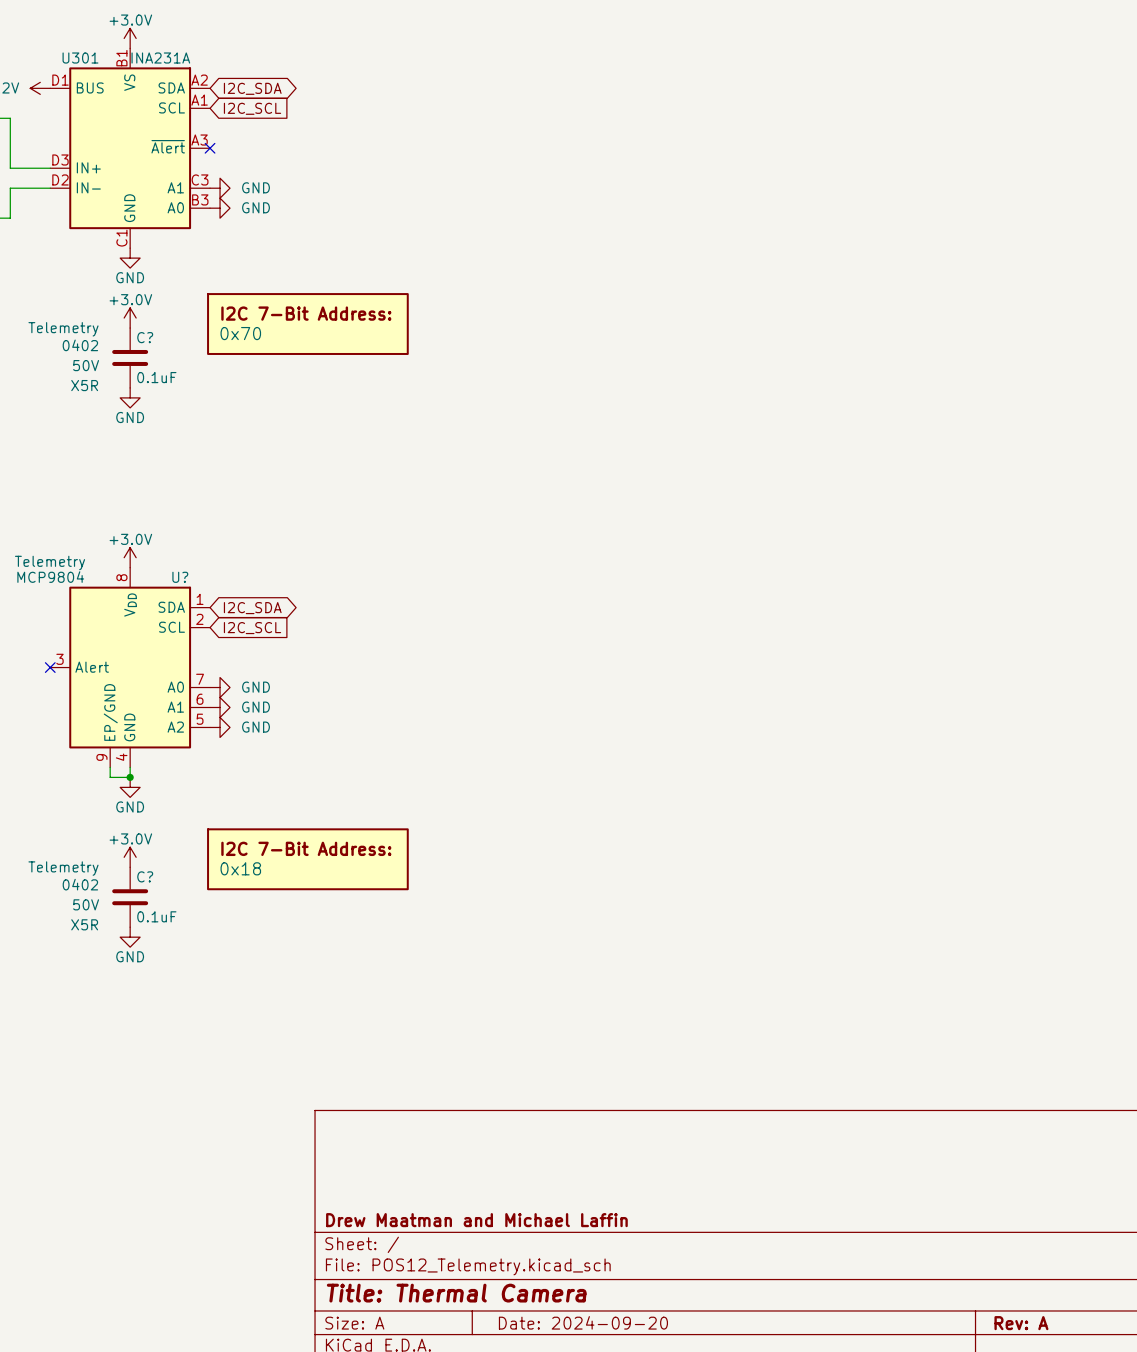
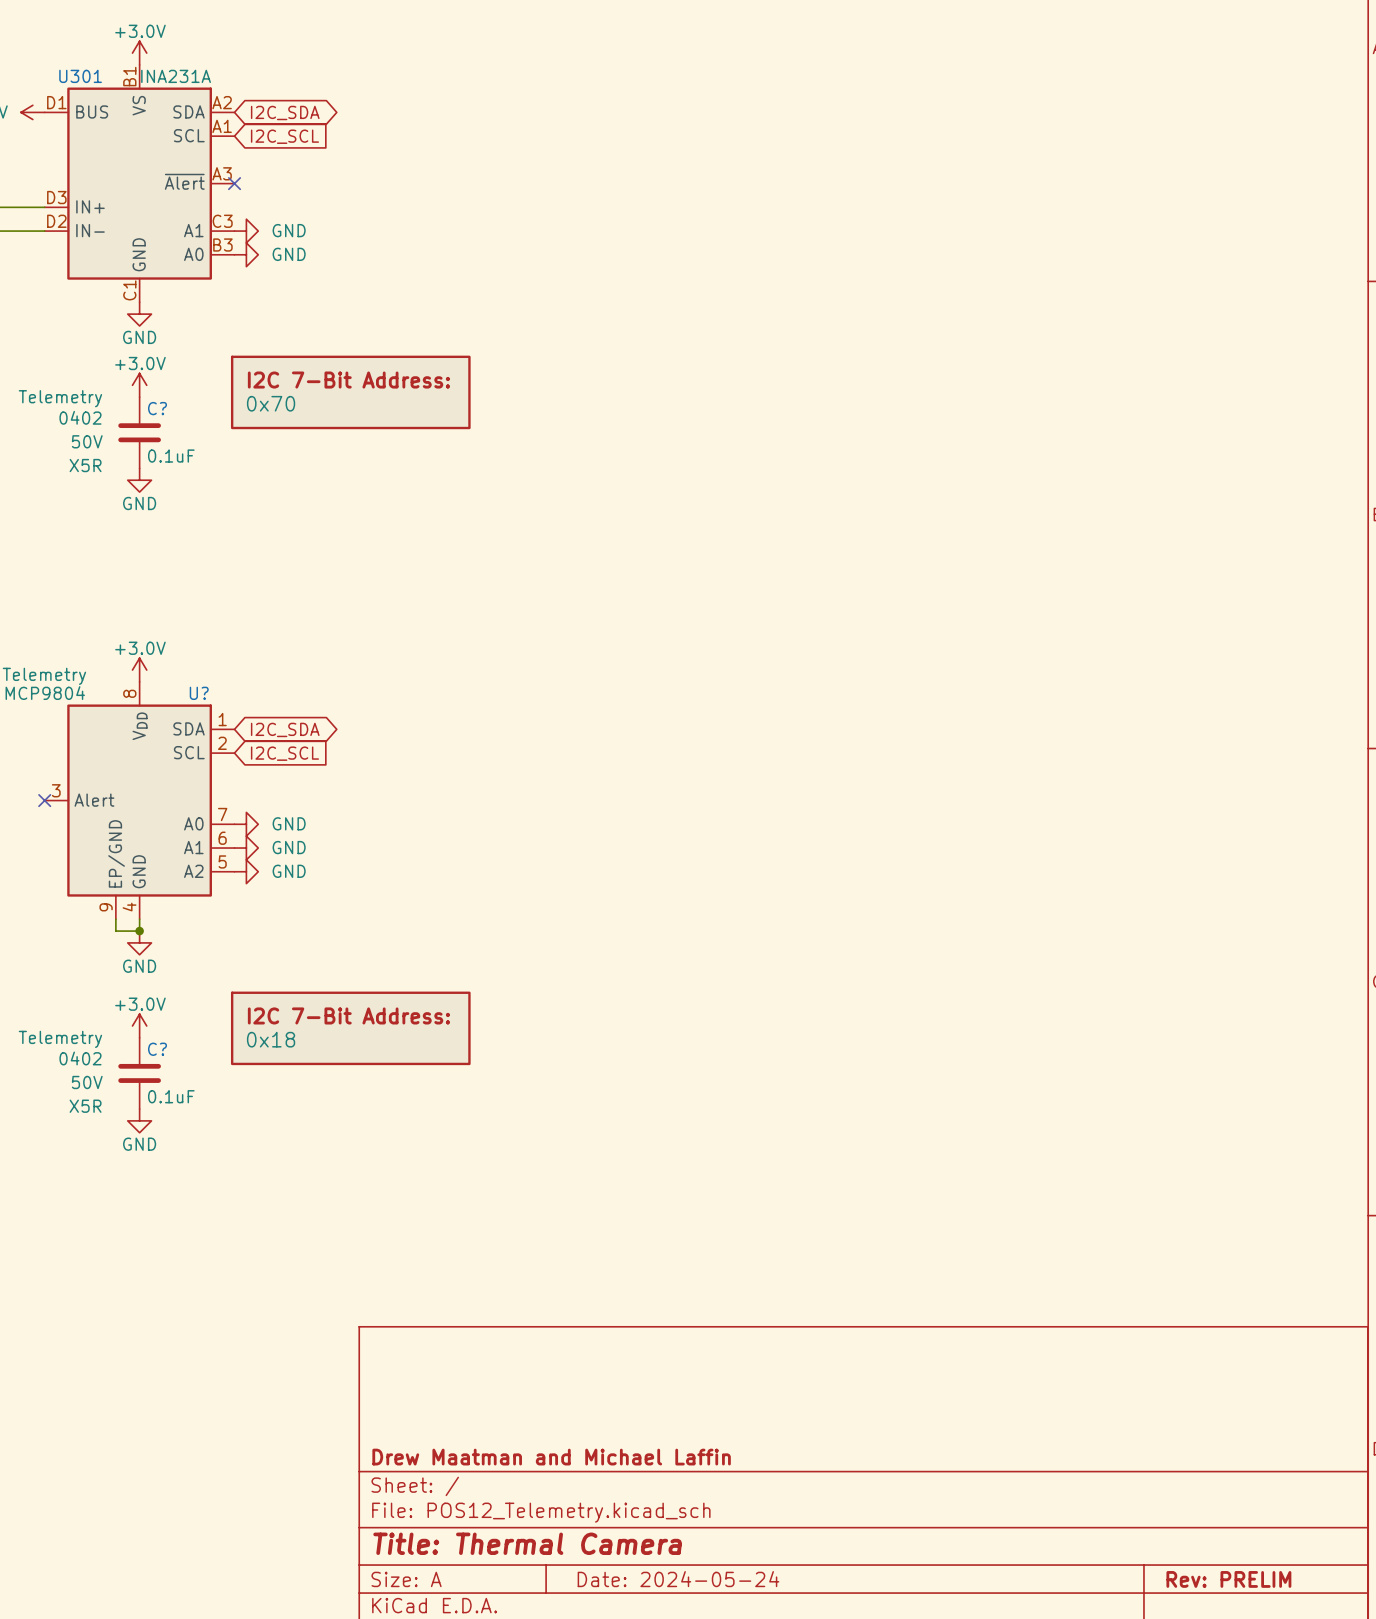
title block: Date: 2024-09-20 (583, 1322) -> Date: 2024-05-24 (678, 1579)
title block: Rev: A (1021, 1323) -> Rev: PRELIM (1228, 1579)

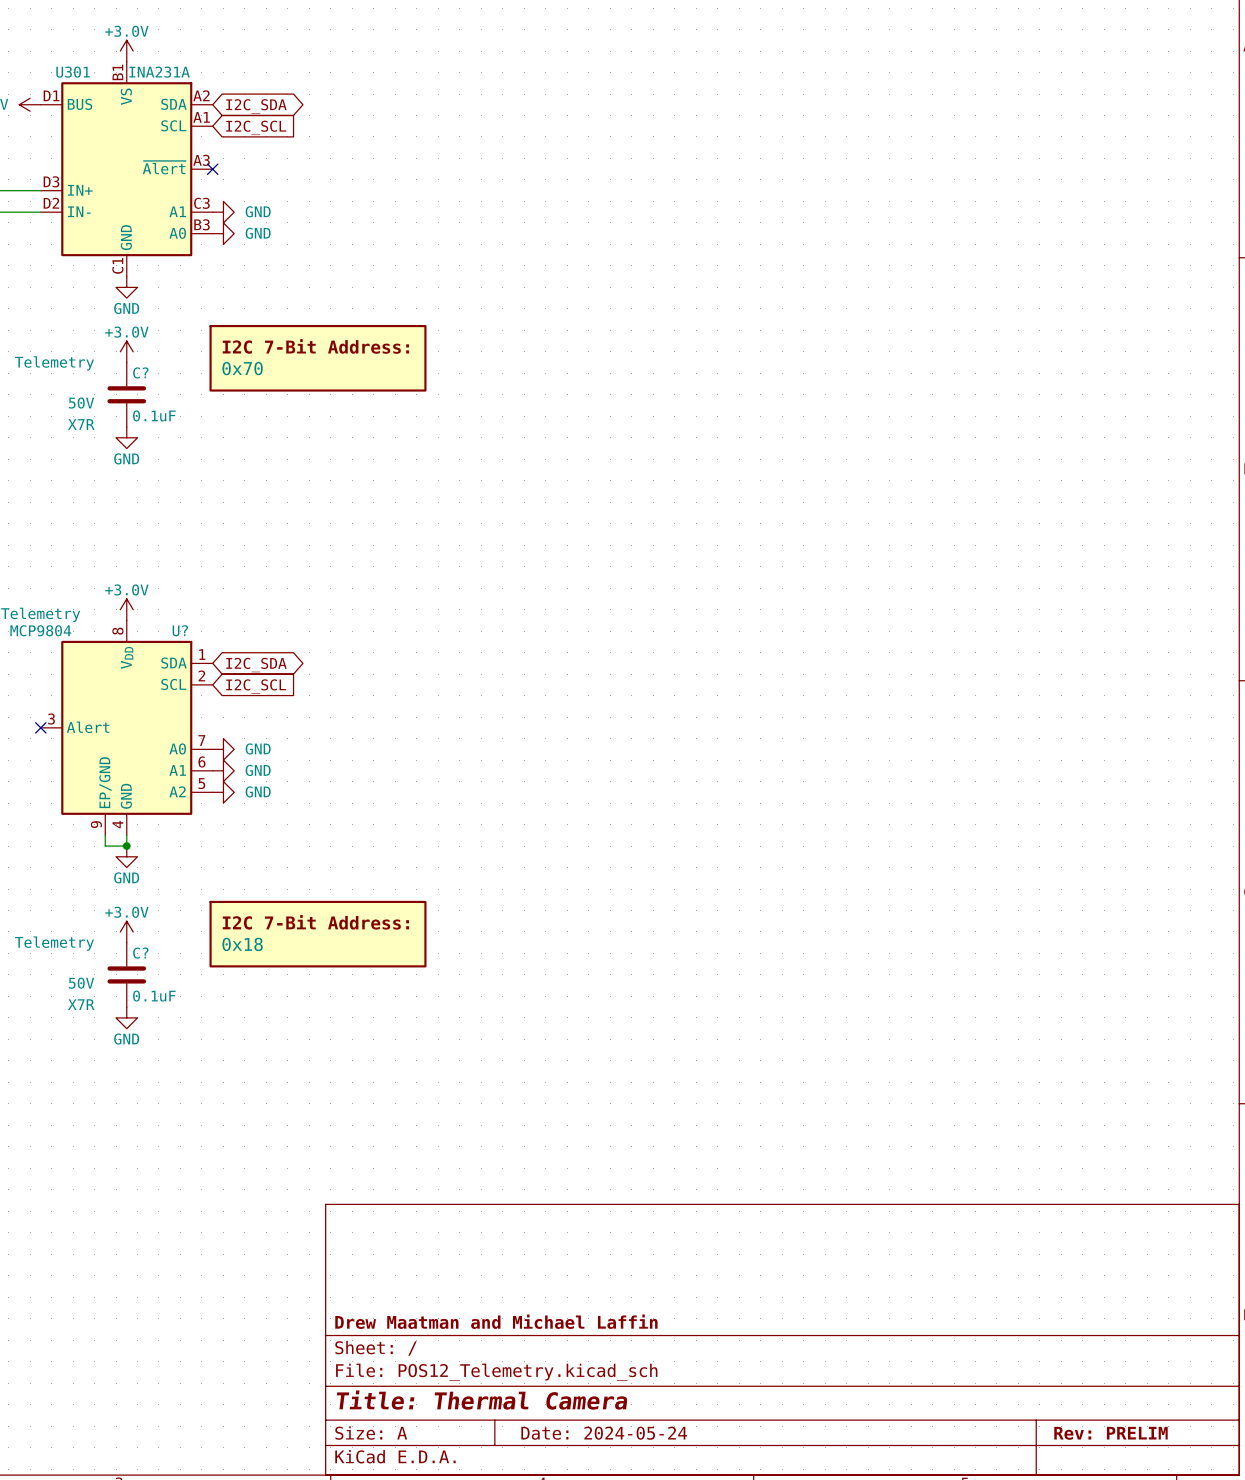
C? text: 0402 (80, 417) -> none
C? text: X5R (85, 465) -> X7R (81, 424)
C? text: 0402 (80, 1058) -> none
C? text: X5R (85, 1106) -> X7R (81, 1004)

